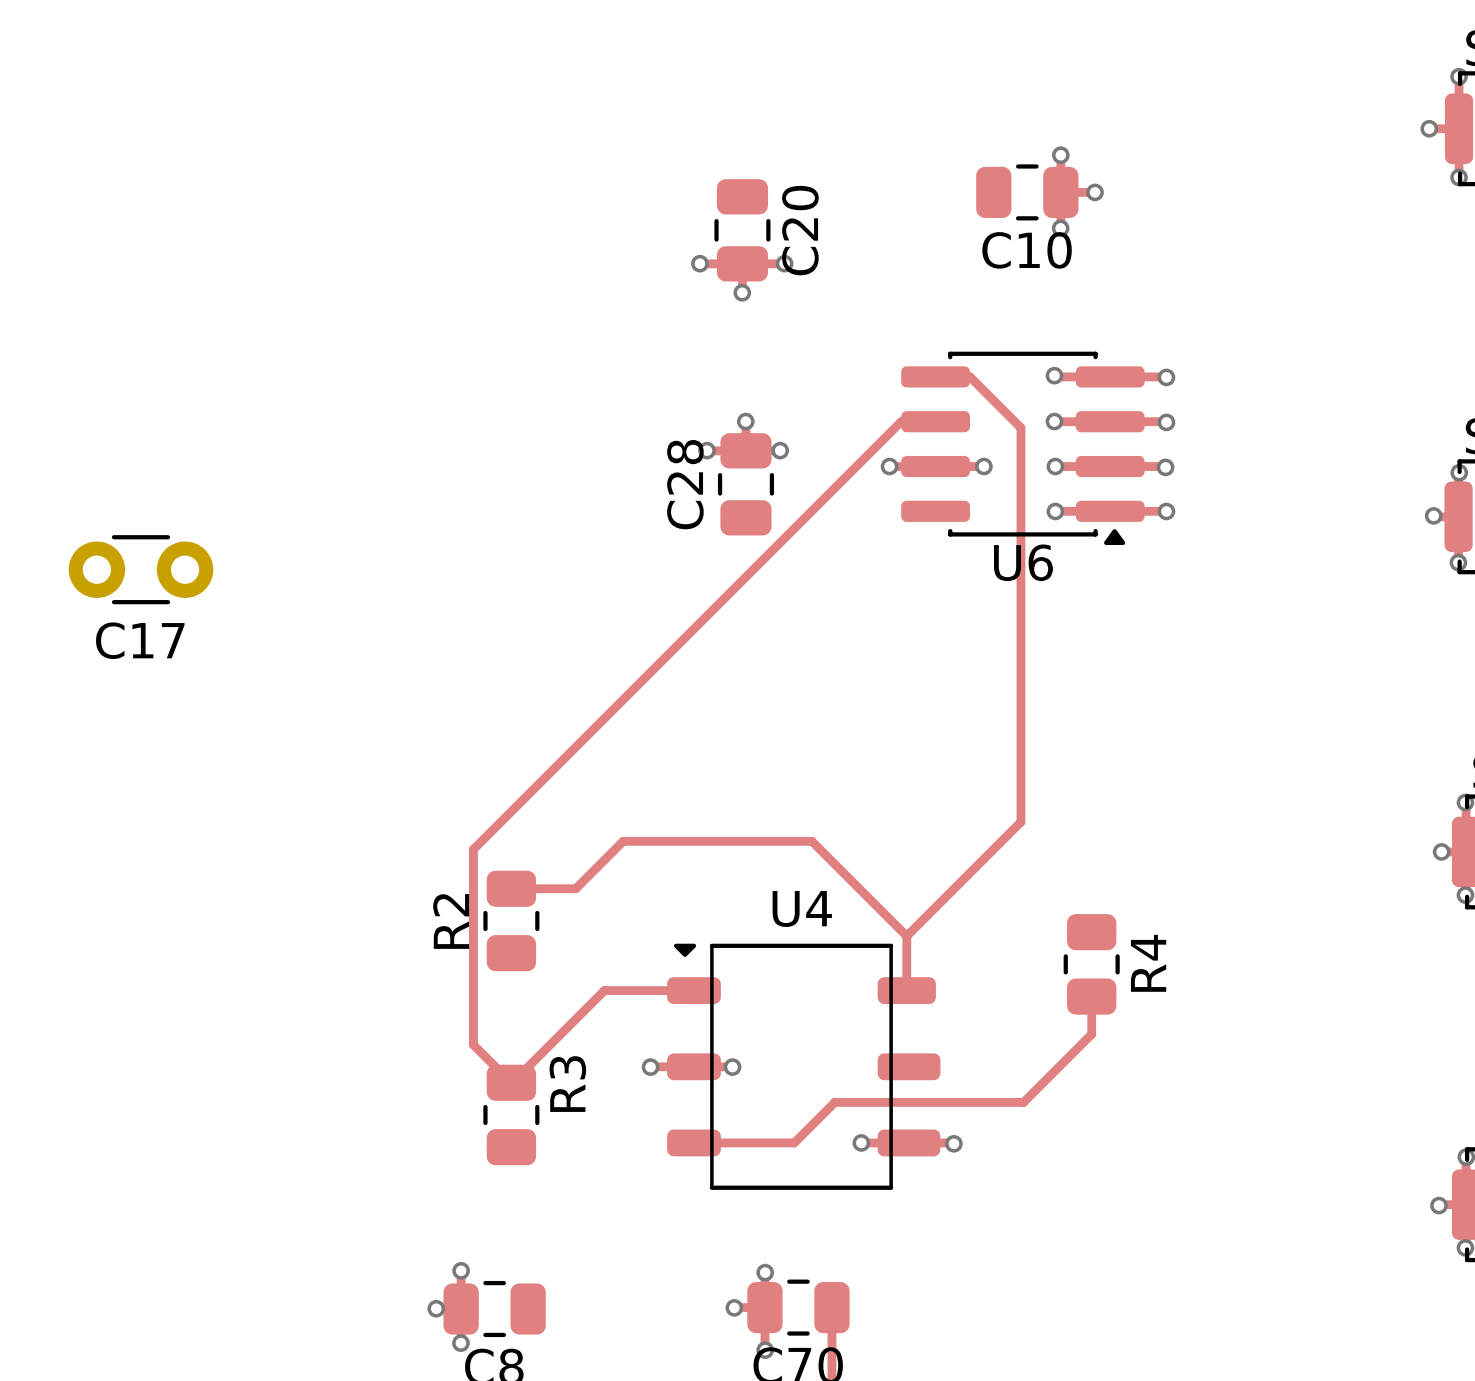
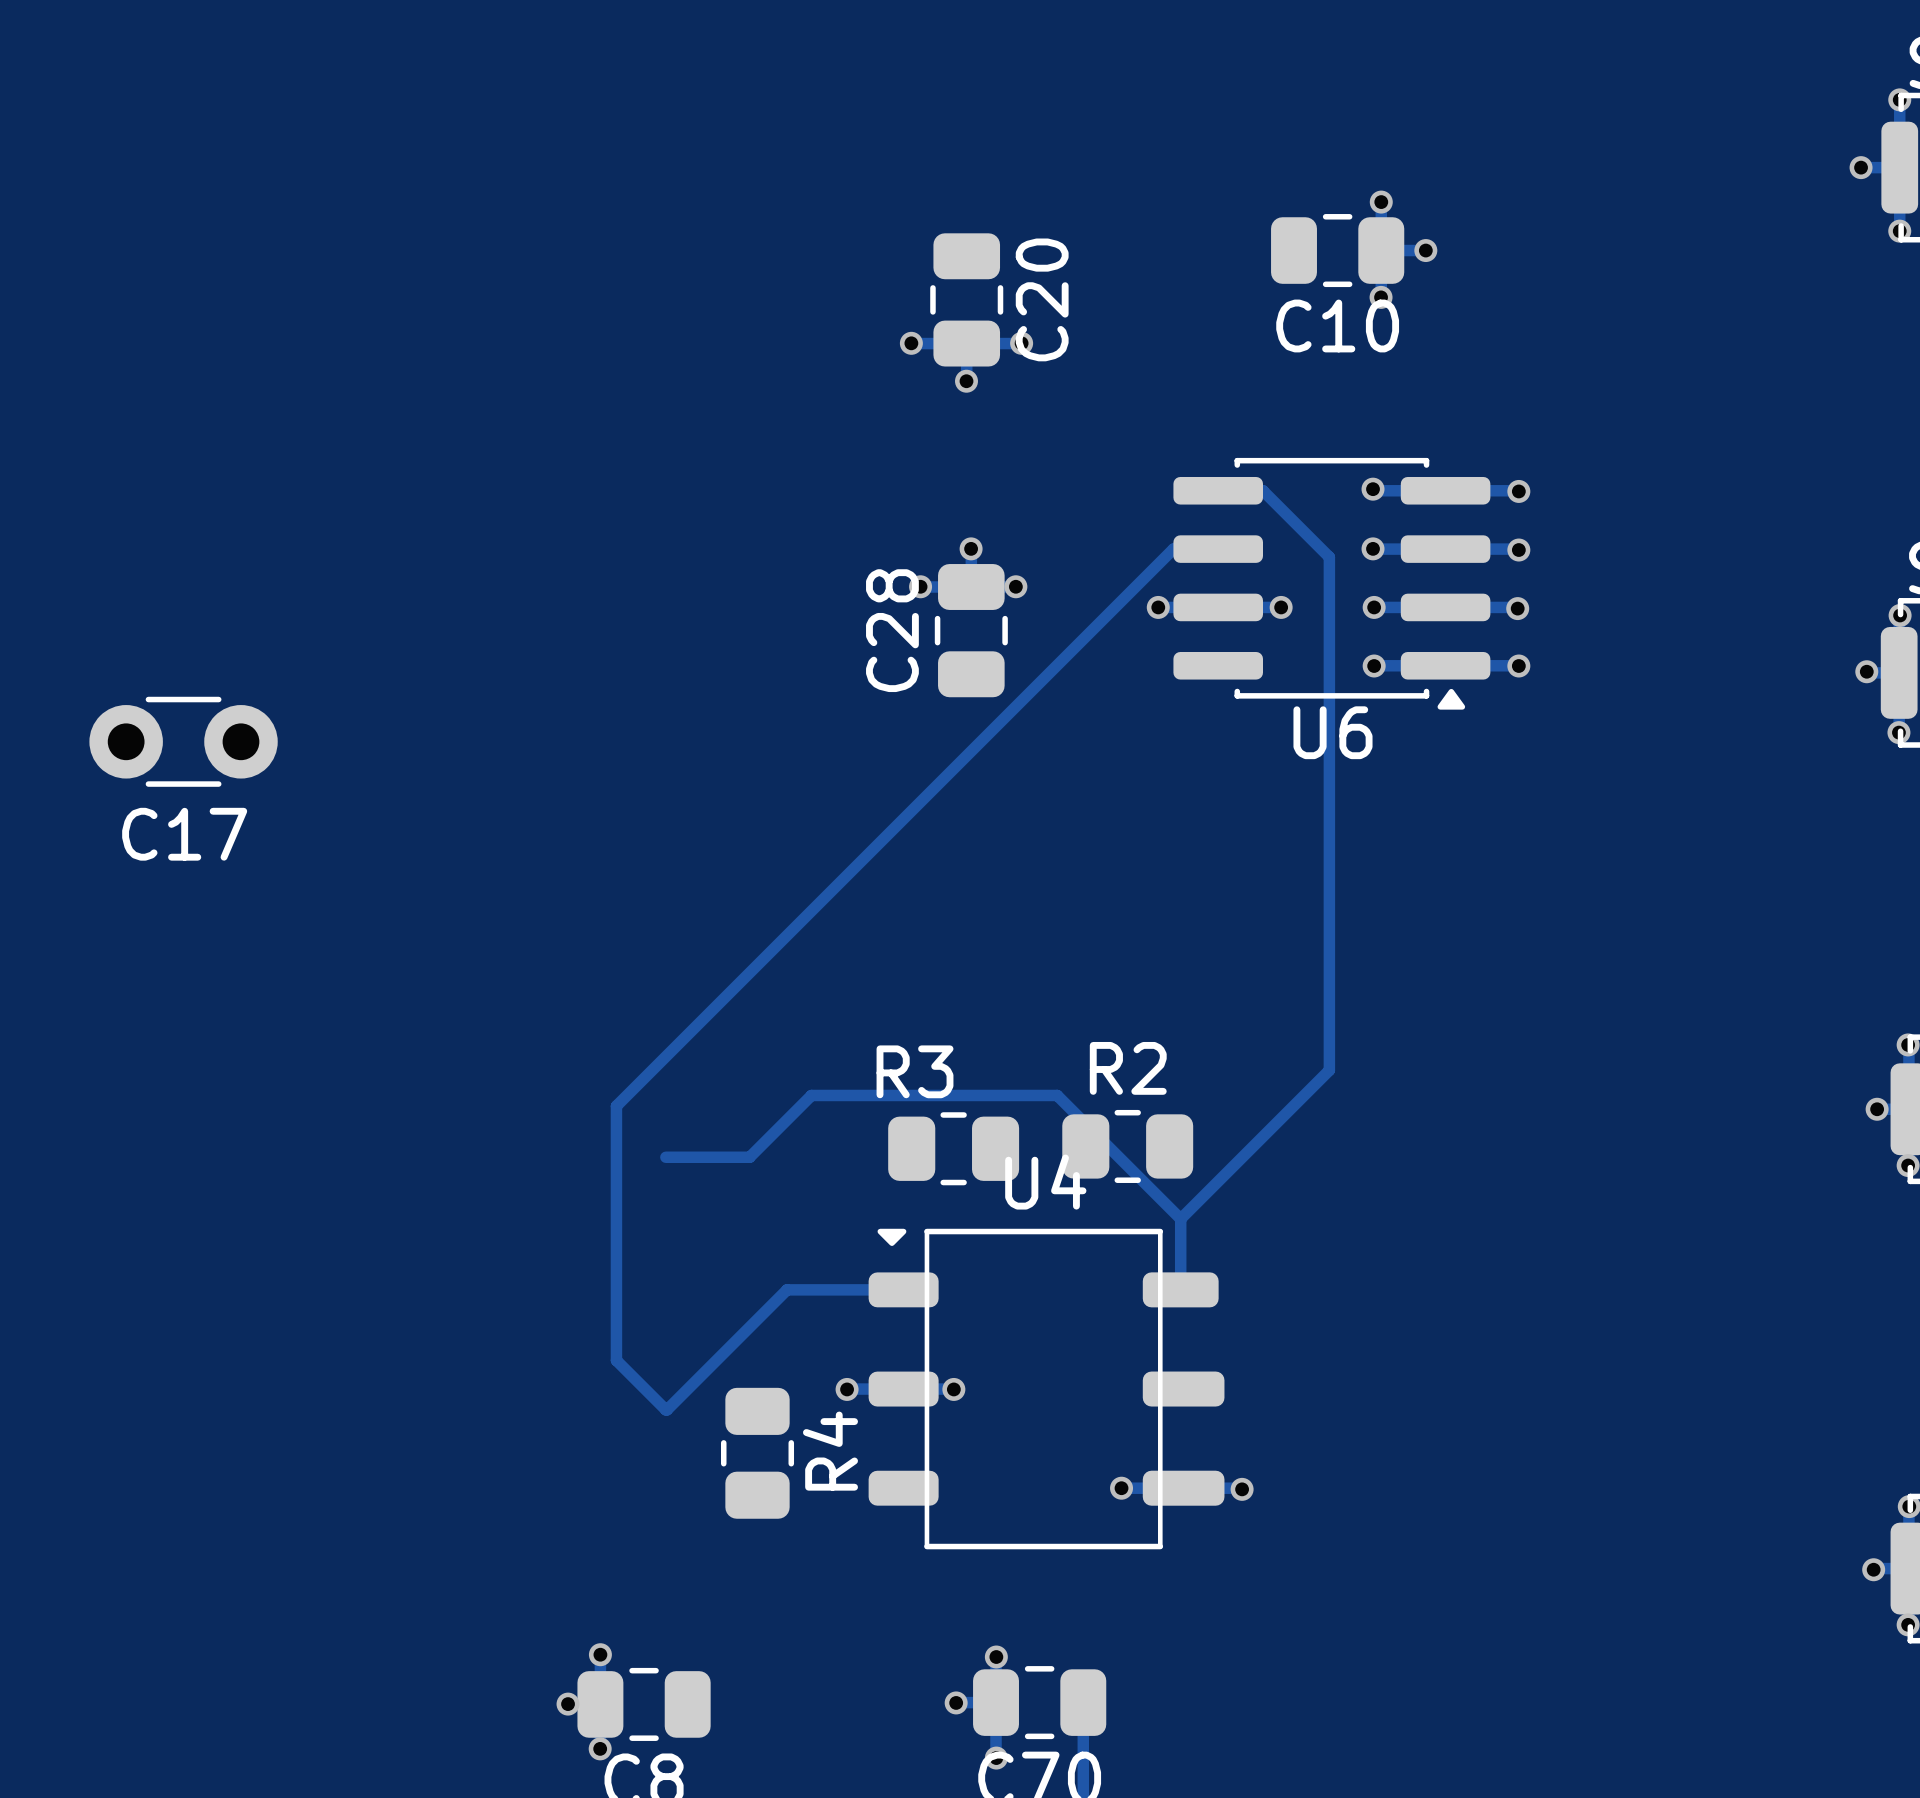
R2 rotation: 0° (511, 920) -> 90° clockwise (1127, 1146)
R2 position: (511, 920) -> (1127, 1146)
R4 position: (1091, 964) -> (757, 1453)
track: (1091, 996) (1091, 1034) (1023, 1102) (834, 1102) (794, 1142) (693, 1142) -> none
R3 name position: R3 (567, 1084) -> R3 (915, 1071)
R3 rotation: 0° (511, 1114) -> 90° clockwise (953, 1148)
R3 position: (511, 1114) -> (953, 1148)

